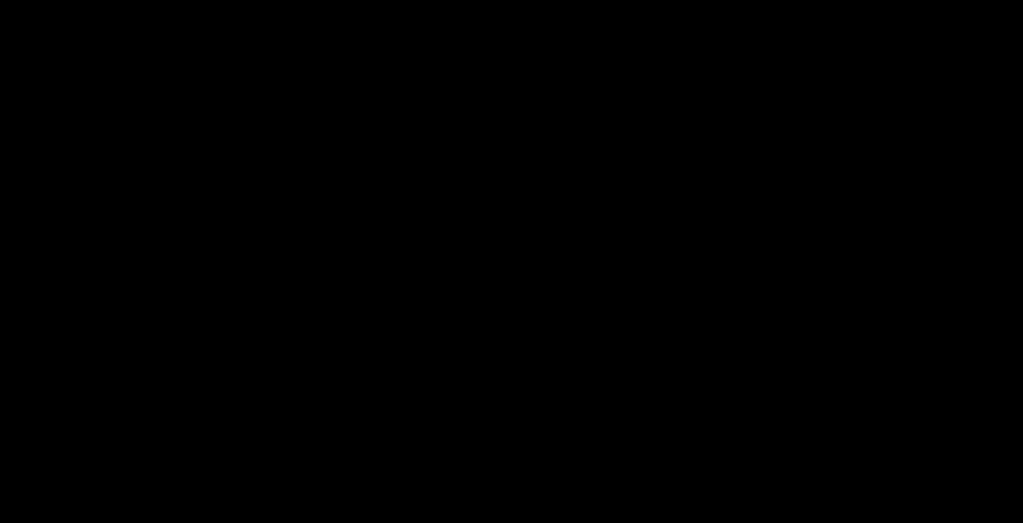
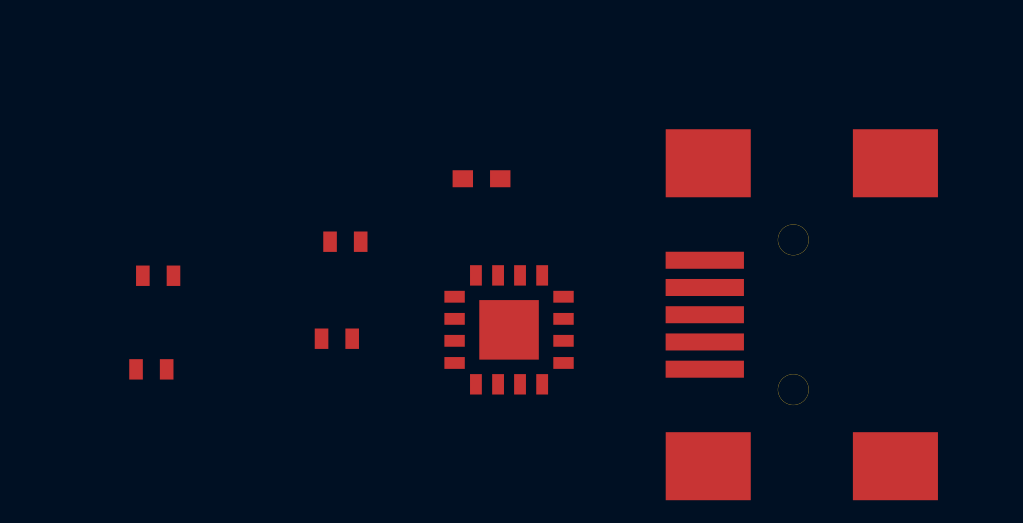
part: none -> (481, 178)
part: none -> (345, 241)
part: none -> (158, 275)
part: none -> (801, 314)
part: none -> (509, 329)
part: none -> (336, 338)
part: none -> (151, 369)

